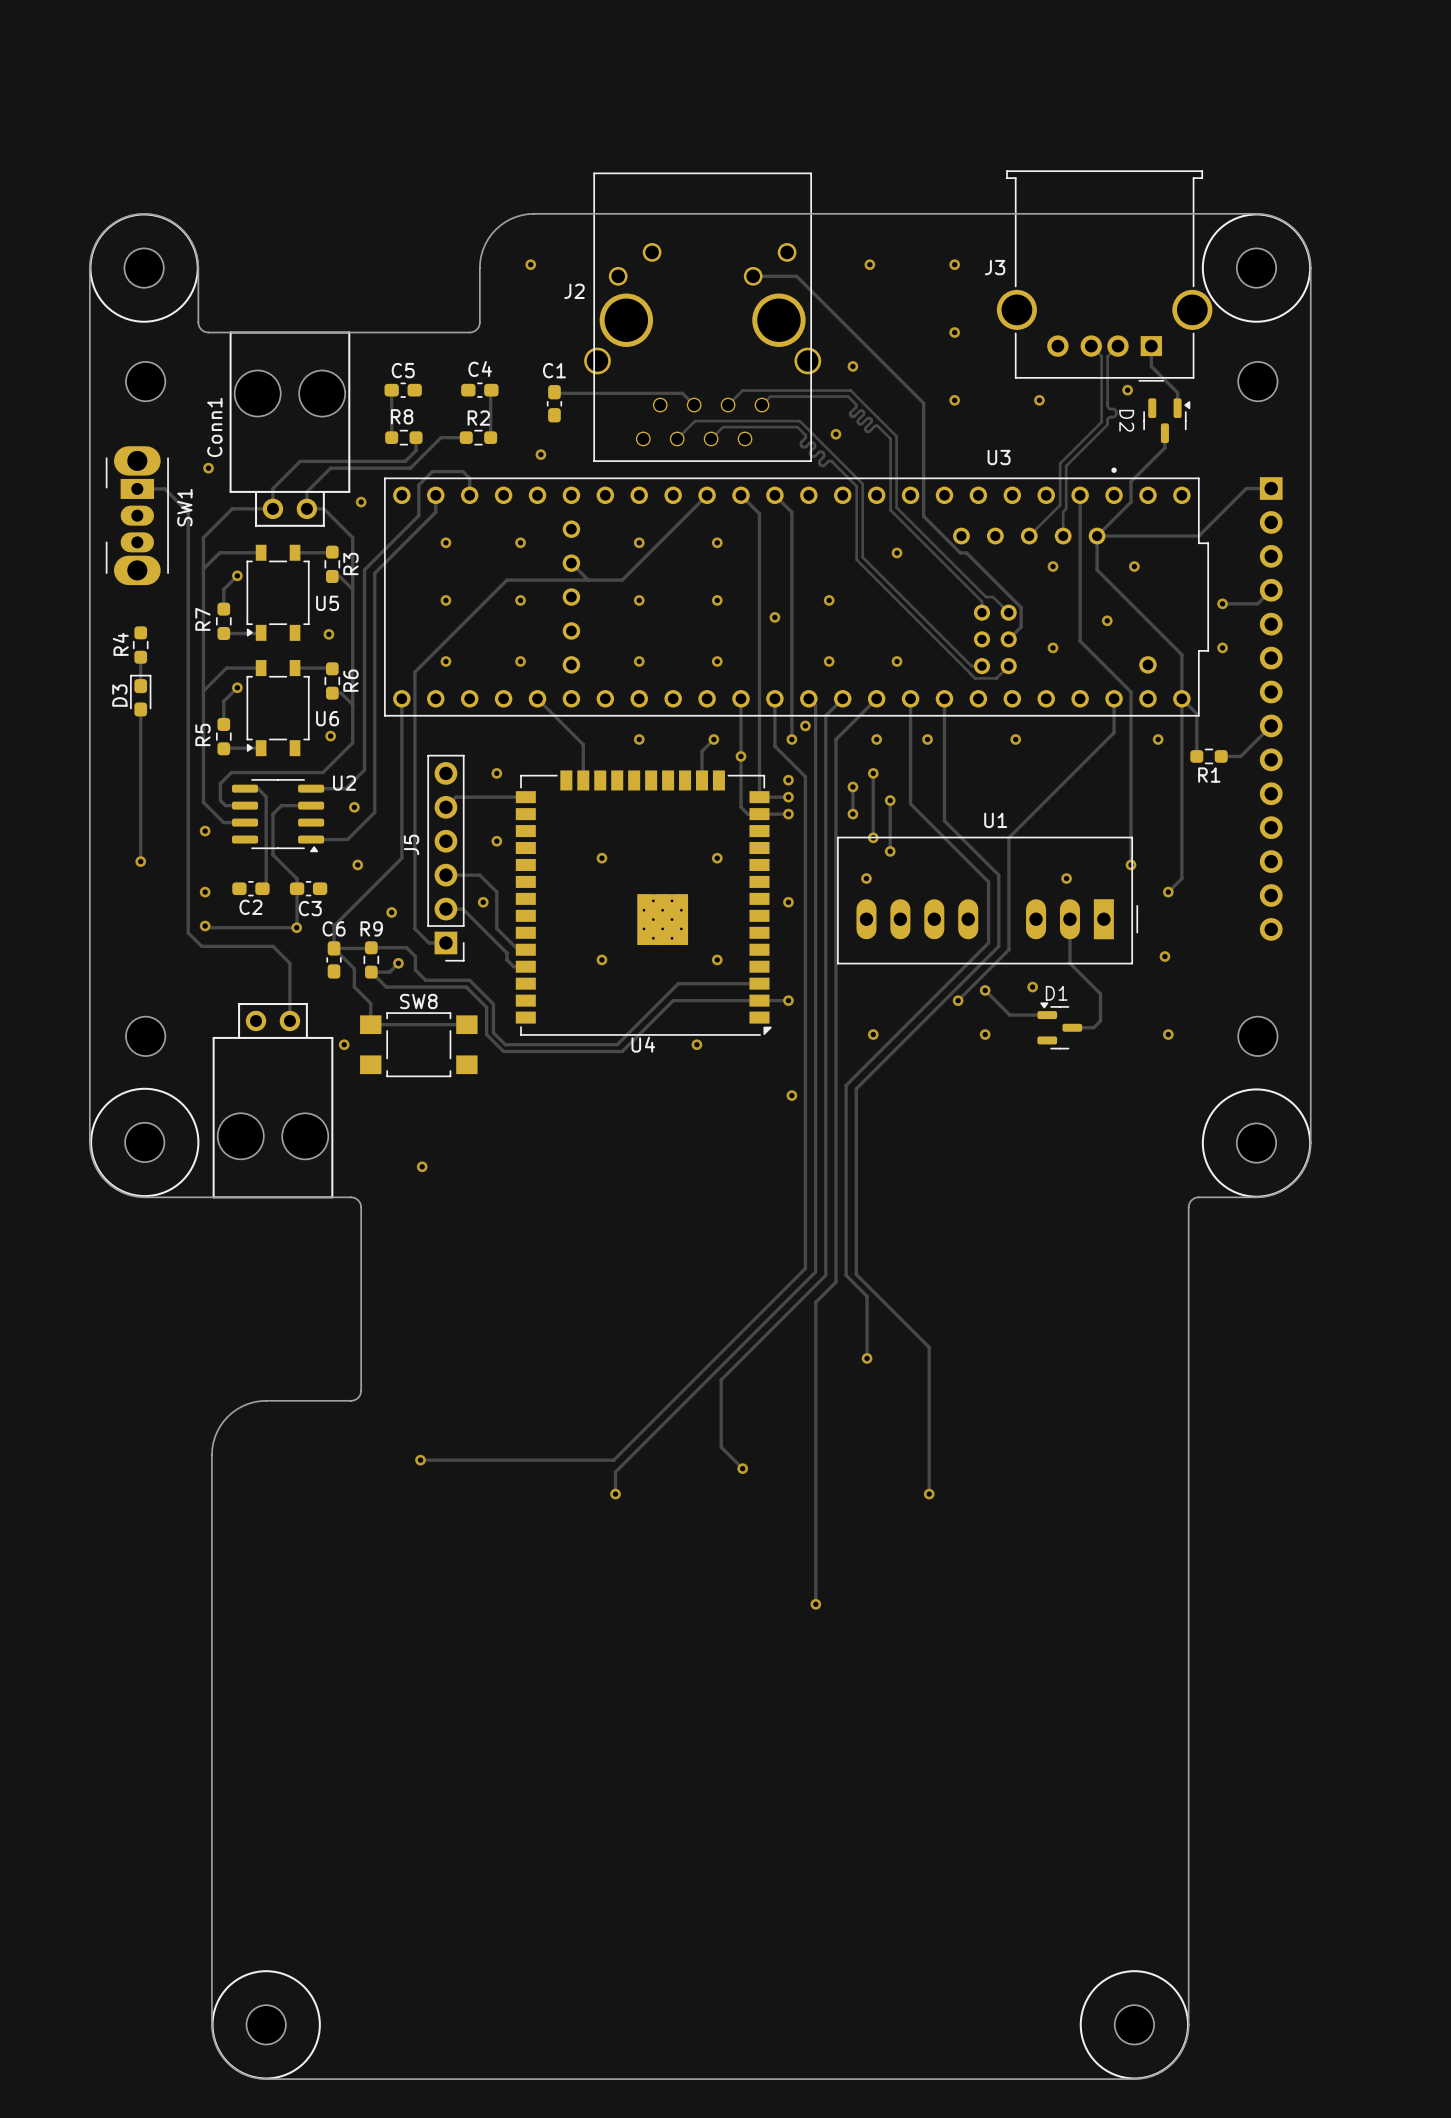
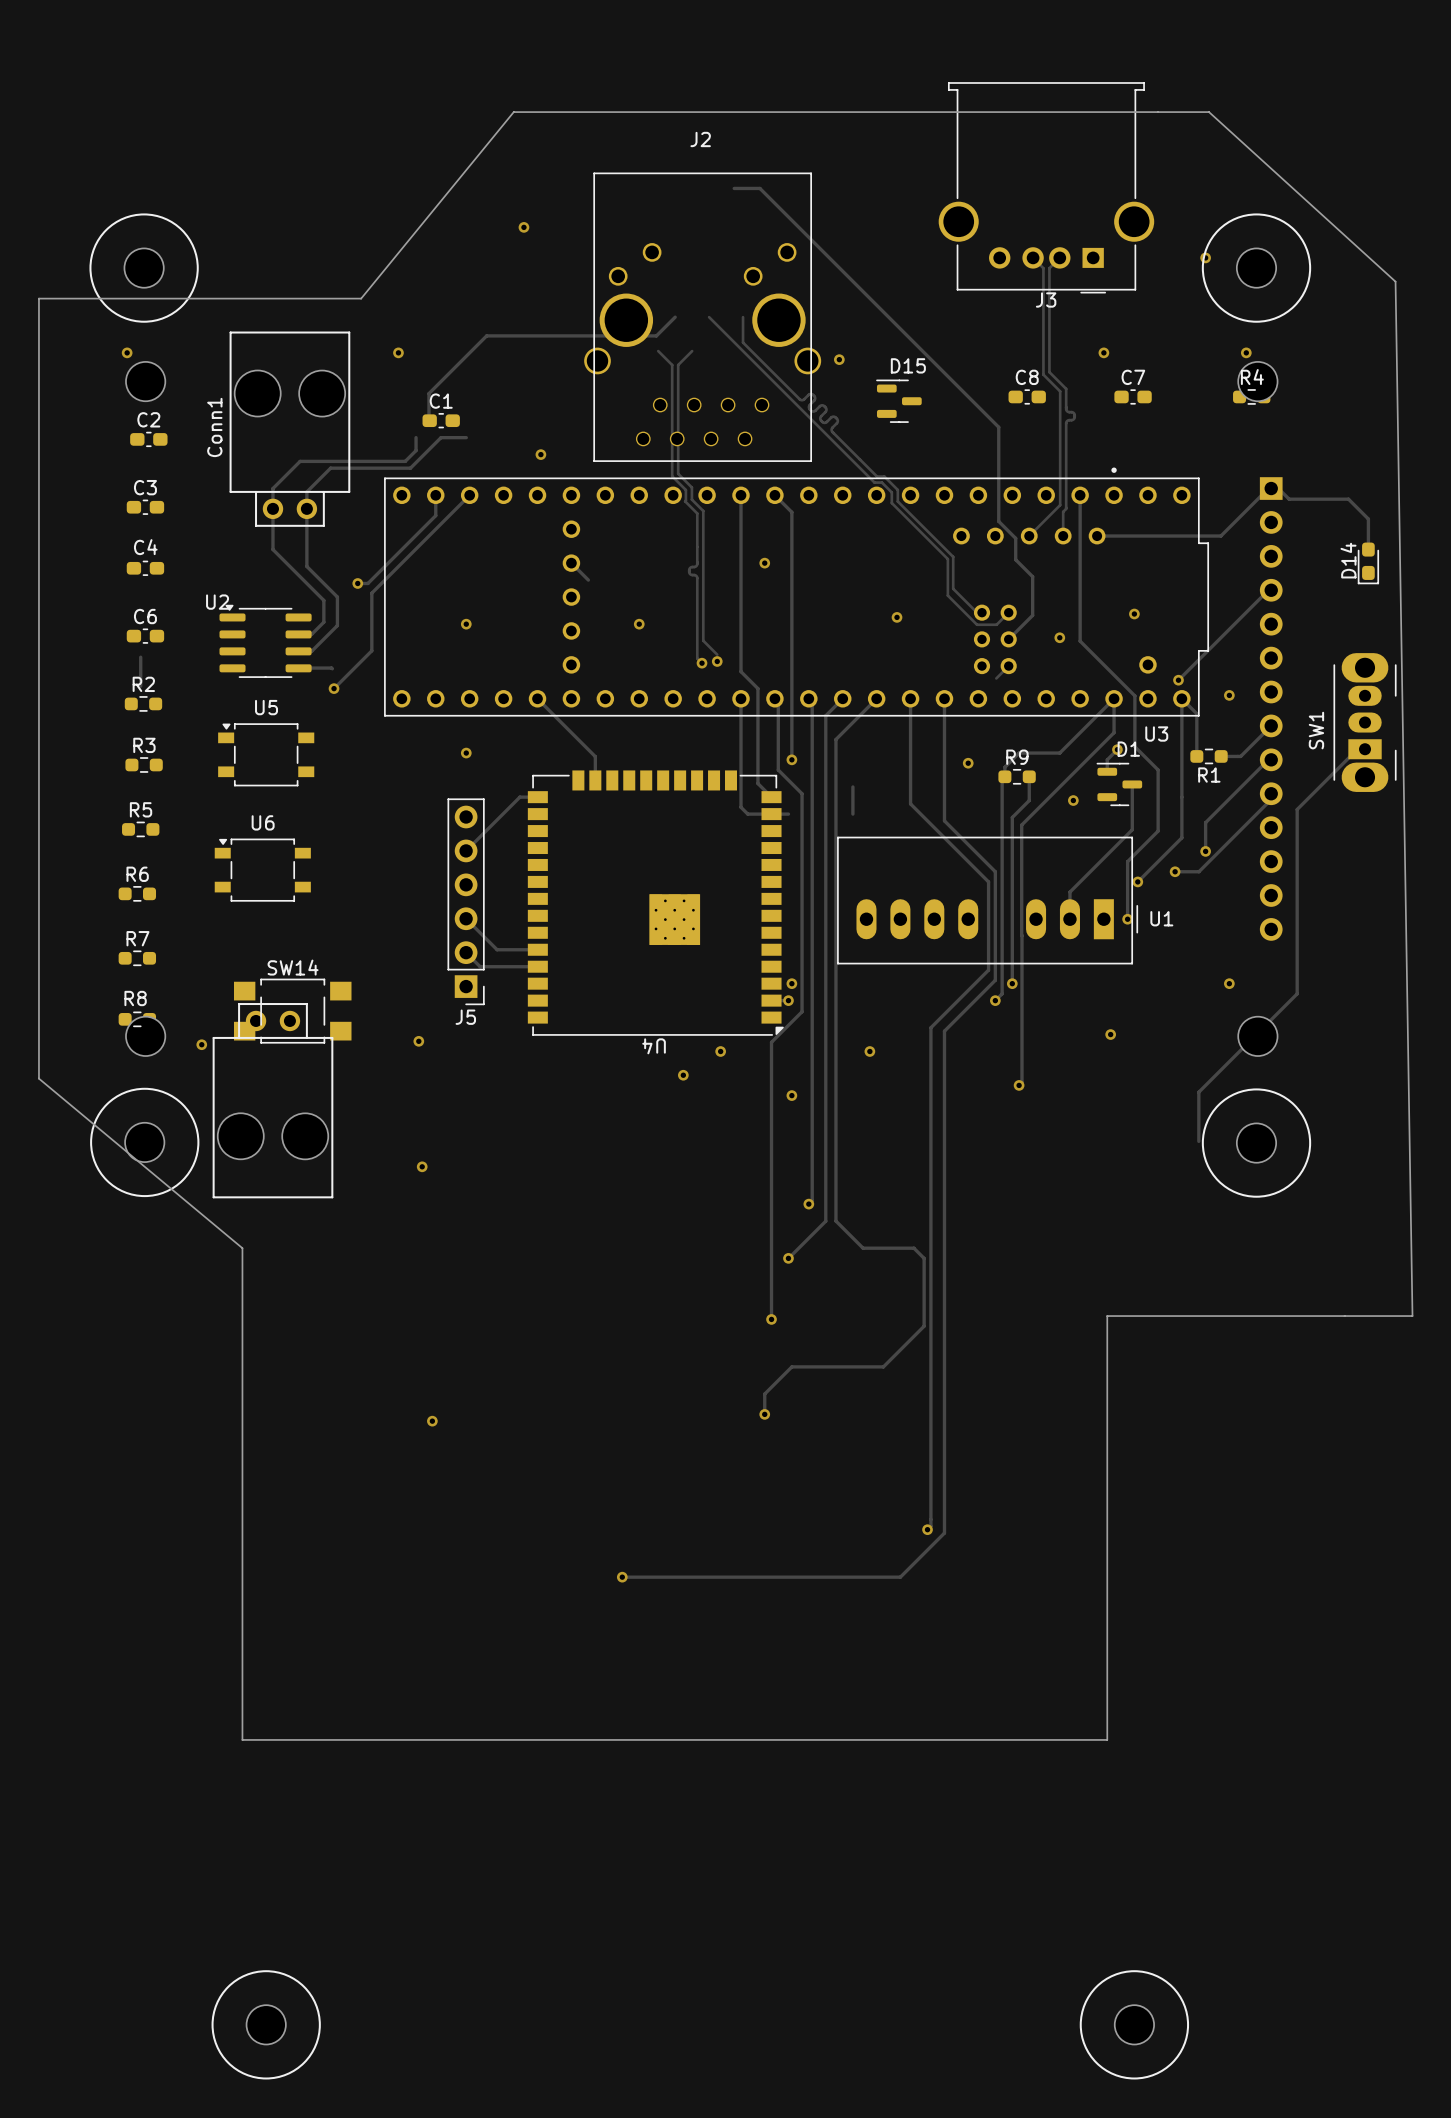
board edge: (534, 213) (1256, 213) (1274, 216) (1290, 225) (1298, 234) (1307, 250) (1310, 268) (1310, 1149) (1305, 1166) (1298, 1176) (1280, 1191) (1262, 1196) (1197, 1197) (1191, 1200) (1188, 1206) (1188, 2024) (1185, 2042) (1176, 2058) (1168, 2067) (1152, 2076) (1134, 2079) (266, 2079) (248, 2076) (232, 2067) (223, 2058) (214, 2042) (211, 2024) (213, 1443) (223, 1421) (232, 1412) (248, 1403) (266, 1400) (352, 1400) (359, 1395) (361, 1206) (357, 1199) (350, 1197) (137, 1196) (123, 1193) (111, 1185) (101, 1175) (91, 1157) (89, 1143) (90, 261) (96, 242) (103, 232) (113, 223) (124, 217) (137, 214) (157, 215) (169, 220) (180, 227) (188, 237) (194, 248) (198, 268) (198, 323) (204, 331) (471, 332) (476, 329) (479, 323) (480, 262) (485, 244) (495, 229) (505, 222) (516, 216) (534, 213) -> (513, 112) (361, 298) (38, 298) (38, 1078) (242, 1248) (242, 1739) (1107, 1739) (1107, 1316) (1412, 1316) (1395, 281) (1209, 112) (513, 112)
via: none -> (1205, 257)
via position: (530, 264) -> (523, 227)
via: (869, 264) -> none
via: (954, 264) -> none
J3 name position: J3 (995, 267) -> J3 (1046, 300)
J3 position: (1104, 275) -> (1046, 187)
track: (753, 276) (796, 276) (923, 403) (923, 516) (960, 552) (966, 552) (1021, 607) (1021, 626) -> (734, 188) (759, 188) (998, 427) (998, 521) (1015, 538) (1015, 559) (1032, 576) (1032, 615) (1021, 626)
J2 name position: J2 (574, 291) -> J2 (700, 139)
track: none -> (675, 317) (656, 335) (486, 335) (428, 393) (429, 420)
via: (954, 332) -> none
track: (1091, 346) (1101, 356) (1101, 422) (1060, 463) -> (1033, 257) (1043, 268) (1043, 374) (1060, 391) (1060, 463)
track: (1117, 346) (1107, 356) (1107, 406) (1115, 409) (1115, 415) (1108, 417) (1107, 424) (1066, 466) -> (1059, 257) (1049, 268) (1049, 372) (1066, 388) (1066, 409) (1074, 414) (1073, 419) (1066, 423) (1066, 466)
track: (1151, 346) (1151, 366) (1177, 392) (1177, 408) -> none
track: none -> (658, 351) (672, 365) (672, 476) (685, 490) (685, 501) (697, 513) (697, 564) (690, 567) (689, 571) (697, 577) (697, 658) (701, 663)
track: none -> (692, 351) (678, 365) (678, 473) (691, 487) (691, 499) (703, 511) (703, 640) (717, 654)
via: none -> (127, 352)
via: none -> (398, 352)
via: none -> (1103, 352)
via: none -> (1246, 352)
via position: (852, 366) -> (839, 359)
track: (391, 390) (391, 437) -> none
C5: (403, 390) -> none
C4 position: (479, 390) -> (145, 568)
track: (491, 390) (490, 437) -> none
via: (1127, 390) -> none
track: (554, 392) (682, 393) (694, 405) -> none
C8: none -> (1027, 396)
C7: none -> (1133, 396)
via: (954, 400) -> none
via: (1039, 400) -> none
D15: none -> (898, 401)
C1 rotation: 0° (554, 403) -> 90° clockwise (441, 420)
C1 position: (554, 403) -> (441, 420)
track: (728, 405) (742, 390) (850, 390) (896, 436) (896, 507) (986, 597) (993, 597) (1008, 612) -> (709, 317) (874, 482) (881, 482) (891, 492) (891, 503) (947, 559) (947, 595) (977, 624) (996, 624) (1008, 612)
track: (762, 405) (770, 396) (848, 396) (856, 405) (850, 412) (850, 415) (853, 416) (861, 410) (864, 413) (857, 420) (859, 423) (861, 424) (868, 418) (871, 419) (865, 428) (865, 430) (869, 431) (877, 425) (890, 438) (890, 510) (982, 601) (982, 612) -> (743, 317) (743, 342) (800, 399) (803, 399) (809, 394) (813, 394) (815, 399) (809, 408) (813, 411) (821, 405) (825, 407) (826, 410) (820, 418) (822, 422) (826, 422) (832, 416) (836, 418) (837, 422) (832, 428) (832, 431) (877, 476) (884, 476) (897, 489) (897, 501) (953, 556) (953, 588) (977, 612) (982, 612)
D2: (1166, 420) -> none
track: (1164, 433) (1164, 447) (1131, 481) (1131, 502) (1097, 536) (1097, 569) (1181, 654) (1181, 698) -> none
via: (835, 434) -> none
R8 position: (403, 437) -> (137, 1019)
R2 position: (478, 437) -> (143, 703)
track: (677, 438) (695, 421) (799, 421) (862, 483) (862, 557) (971, 666) (982, 666) -> none
track: (711, 438) (722, 427) (797, 427) (805, 435) (800, 442) (801, 445) (805, 447) (812, 442) (815, 445) (810, 452) (811, 455) (814, 456) (820, 451) (824, 453) (819, 461) (820, 464) (823, 465) (831, 461) (856, 486) (856, 559) (969, 673) -> none
U3 name position: U3 (999, 457) -> U3 (1156, 734)
via: (208, 468) -> none
track: (137, 488) (164, 488) (188, 512) (188, 932) (201, 946) (272, 946) (289, 963) (289, 1020) -> none
track: (1271, 488) (1246, 488) (1198, 536) -> (1368, 549) (1368, 519) (1348, 499) (1289, 499) (1273, 483) (1220, 536) (1198, 536)
track: (469, 495) (469, 478) (462, 471) (432, 471) (418, 485) (418, 515) (364, 569) (364, 770) (345, 788) (311, 788) -> (469, 495) (371, 593) (371, 650) (334, 688)
track: (741, 495) (759, 513) (759, 797) (788, 797) -> (741, 495) (741, 671) (757, 688) (757, 783) (771, 797)
via: (361, 502) -> none
track: (700, 502) (622, 580) (506, 580) (414, 672) (414, 928) (428, 942) (445, 942) -> none
track: (272, 508) (232, 508) (203, 537) (203, 802) (223, 822) (245, 822) -> (272, 508) (272, 549) (323, 600) (323, 622) (311, 634) (298, 634)
track: (306, 508) (323, 508) (352, 537) (352, 742) (323, 772) (231, 772) (220, 783) (220, 800) (225, 805) (245, 805) -> (306, 508) (306, 566) (337, 597) (337, 625) (311, 651) (298, 651)
track: (435, 512) (374, 573) (374, 812) (347, 839) (311, 839) -> (435, 512) (435, 515) (367, 583) (357, 583)
SW1 rotation: 0° (137, 515) -> 180° (1365, 722)
SW1 position: (137, 515) -> (1365, 722)
via: (445, 542) -> none
via: (520, 542) -> none
via: (639, 542) -> none
via: (717, 542) -> none
track: (261, 552) (219, 552) (203, 569) -> none
track: (332, 552) (295, 552) -> none
via: (897, 552) -> none
R3 name position: R3 (350, 563) -> R3 (144, 745)
via: none -> (764, 563)
D14: none -> (1368, 563)
R3 rotation: 0° (332, 564) -> 90° clockwise (144, 764)
R3 position: (332, 564) -> (144, 764)
via: (1053, 566) -> none
via: (1134, 566) -> none
track: (237, 575) (223, 589) (223, 609) -> none
via: (237, 575) -> none
track: (332, 576) (339, 576) (352, 589) -> none
via: none -> (357, 583)
track: none -> (1273, 585) (1178, 680)
track: (1271, 590) (1257, 603) (1222, 603) -> none
U5 rotation: 0° (278, 592) -> 90° clockwise (266, 754)
U5 position: (278, 592) -> (266, 754)
via: (445, 600) -> none
via: (520, 600) -> none
via: (639, 600) -> none
via: (717, 600) -> none
via: (829, 600) -> none
U5 name position: U5 (327, 603) -> U5 (266, 707)
via: (1222, 603) -> none
via: none -> (1134, 614)
via: (774, 617) -> none
via: none -> (897, 617)
via: (1107, 620) -> none
R7 rotation: 0° (223, 621) -> 90° clockwise (137, 958)
R7 position: (223, 621) -> (137, 958)
via: none -> (466, 624)
via: none -> (639, 624)
track: (261, 632) (223, 633) -> none
via: (328, 634) -> none
R4 rotation: 0° (140, 645) -> 90° clockwise (1251, 396)
R4 position: (140, 645) -> (1251, 396)
via position: (1053, 647) -> (1059, 637)
via: (1222, 647) -> none
via: (445, 661) -> none
via: (520, 661) -> none
via: (639, 661) -> none
via: (829, 661) -> none
via: (897, 661) -> none
via: none -> (701, 663)
track: (261, 668) (226, 668) (203, 691) -> none
track: (969, 673) (975, 678) (996, 678) -> none
R6 rotation: 0° (332, 680) -> 90° clockwise (137, 893)
R6 position: (332, 680) -> (137, 893)
R6 name position: R6 (350, 680) -> R6 (137, 874)
via: none -> (1178, 680)
track: (237, 687) (223, 701) (223, 724) -> none
via: (237, 687) -> none
via: none -> (334, 688)
track: (1131, 692) (1131, 864) -> (1131, 692) (1134, 695) (1134, 746) (1158, 770) (1158, 831) (1127, 861) (1127, 919)
track: (332, 693) (341, 693) (352, 704) -> none
D3: (140, 695) -> none
via: none -> (1229, 695)
track: (401, 698) (401, 858) (334, 926) (334, 948) -> none
track: (774, 698) (774, 746) (805, 776) (805, 1268) (613, 1460) (420, 1460) -> (774, 698) (778, 702) (778, 770) (802, 793) (802, 1011) (771, 1042) (771, 1319)
track: none -> (1114, 698) (1059, 753) (1019, 753) (1004, 767) (1004, 776) (1002, 779) (1002, 993) (995, 1000)
track: (812, 702) (815, 705) (815, 1271) (615, 1472) (615, 1494) -> (812, 702) (812, 1200) (808, 1204)
U6 rotation: 0° (278, 708) -> 90° clockwise (262, 870)
U6 position: (278, 708) -> (262, 870)
track: (140, 709) (140, 861) -> none
U6 name position: U6 (327, 718) -> U6 (263, 822)
via: (805, 725) -> none
R5 rotation: 0° (223, 736) -> 90° clockwise (140, 829)
R5 position: (223, 736) -> (140, 829)
via: (330, 736) -> none
via: (639, 739) -> none
track: (713, 739) (701, 751) (701, 780) -> none
via: (713, 739) -> none
track: none -> (791, 739) (791, 759)
via: (791, 739) -> none
via: (876, 739) -> none
via: (927, 739) -> none
via: (1015, 739) -> none
via: (1158, 739) -> none
track: (583, 744) (583, 780) -> (583, 744) (595, 756) (595, 780)
track: (261, 748) (223, 748) -> none
track: none -> (1117, 749) (1107, 759) (1107, 771)
via: none -> (1117, 749)
track: none -> (1365, 749) (1357, 749) (1297, 809) (1297, 993) (1198, 1092) (1198, 1141)
track: none -> (1273, 754) (1205, 822) (1205, 851)
via: (741, 756) -> none
via: none -> (791, 759)
via: none -> (968, 763)
via position: (496, 773) -> (466, 753)
track: (873, 773) (873, 837) -> none
via: (873, 773) -> none
track: none -> (1029, 776) (1029, 800) (1012, 817) (1012, 983)
via: (788, 780) -> none
U2 name position: U2 (344, 783) -> U2 (217, 602)
via: (852, 786) -> none
track: (245, 788) (258, 788) (266, 796) (266, 884) (262, 888) -> none
track: none -> (1273, 788) (1273, 797) (1198, 871) (1175, 871)
track: (519, 797) (456, 797) (445, 807) -> (519, 797) (466, 850)
via: (788, 797) -> none
track: (890, 800) (890, 851) -> none
via: (890, 800) -> none
via: none -> (1073, 800)
track: (311, 805) (281, 805) (272, 814) (272, 854) (297, 878) (297, 927) (206, 927) (205, 926) -> none
via: (354, 807) -> none
via: (788, 814) -> none
via: (852, 814) -> none
U2 rotation: 0° (278, 815) -> 180° (265, 641)
U2 position: (278, 815) -> (265, 641)
U1 name position: U1 (995, 820) -> U1 (1161, 918)
track: (1021, 825) (1008, 837) (1008, 949) (988, 970) -> (1021, 825) (1021, 1082) (1019, 1085)
via: (205, 831) -> none
via: (873, 837) -> none
track: (1181, 837) (1181, 878) (1168, 892) -> (1181, 837) (1137, 881)
via: (496, 841) -> none
J5 name rotation: 0° (411, 844) -> 90° clockwise (465, 1017)
J5 name position: J5 (411, 844) -> J5 (465, 1017)
via: (890, 851) -> none
via: none -> (1205, 851)
J5 position: (445, 858) -> (466, 901)
via: (601, 858) -> none
via: (717, 858) -> none
via: (140, 861) -> none
via: (357, 864) -> none
via: (1131, 864) -> none
track: (995, 871) (998, 875) (998, 946) (856, 1088) (856, 1274) (929, 1347) (929, 1494) -> (995, 871) (995, 980) (944, 1031) (944, 1533) (900, 1577) (622, 1577)
via: none -> (1175, 871)
track: (445, 875) (479, 875) (496, 892) (496, 928) (518, 949) -> (466, 918) (497, 949) (518, 949)
via: (866, 878) -> none
via: (1066, 878) -> none
via: none -> (1137, 881)
C2 position: (250, 888) -> (148, 439)
C3 position: (308, 888) -> (145, 507)
via: (205, 892) -> none
via: (1168, 892) -> none
via: (483, 902) -> none
via: (788, 902) -> none
U4 position: (643, 903) -> (655, 903)
C2 name position: C2 (250, 907) -> C2 (148, 419)
C3 name position: C3 (310, 908) -> C3 (145, 487)
track: (445, 909) (462, 909) (506, 953) (506, 959) (513, 966) -> (466, 952) (480, 966) (513, 966)
via: (391, 912) -> none
track: (1069, 919) (1069, 963) (1100, 993) (1100, 1020) (1093, 1027) (1072, 1027) -> (1069, 919) (1069, 892) (1132, 829) (1132, 784)
via: none -> (1127, 919)
via: (205, 926) -> none
via: (296, 927) -> none
track: (988, 942) (846, 1085) (846, 1275) (867, 1296) (867, 1358) -> (988, 942) (988, 970)
track: (334, 948) (354, 968) (354, 987) (370, 1003) (370, 1024) (466, 1024) -> none
track: (334, 948) (406, 947) (415, 956) (415, 970) (425, 980) (469, 980) (493, 1004) (493, 1032) (505, 1044) (617, 1044) (678, 983) (759, 983) -> none
via: (1164, 956) -> none
C6 rotation: 0° (334, 959) -> 90° clockwise (145, 636)
C6 position: (334, 959) -> (145, 636)
R9 rotation: 0° (371, 959) -> 90° clockwise (1017, 776)
R9 position: (371, 959) -> (1017, 776)
via: (601, 959) -> none
via: (717, 959) -> none
track: (398, 963) (389, 972) (371, 972) (386, 987) (466, 987) (486, 1007) (486, 1034) (503, 1051) (622, 1051) (673, 1000) (771, 1000) -> none
via: (398, 963) -> none
via: none -> (791, 983)
via: none -> (1012, 983)
via: none -> (1229, 983)
via: (1032, 987) -> none
track: (985, 990) (1009, 1015) (1047, 1015) -> none
via: (985, 990) -> none
track: none -> (958, 1000) (930, 1027) (930, 1526) (927, 1529)
via: (958, 1000) -> none
via: none -> (995, 1000)
D1 footprint: [1037, 1002, 1083, 1050] -> [1096, 762, 1143, 807]
SW14: none -> (292, 1011)
via position: (873, 1034) -> (869, 1051)
via: (985, 1034) -> none
via: none -> (1110, 1034)
via: (1168, 1034) -> none
via: none -> (418, 1041)
via: none -> (201, 1044)
via: (344, 1044) -> none
SW8: (418, 1044) -> none
U4 name rotation: 0° (643, 1044) -> 180° (654, 1046)
via: (696, 1044) -> none
via: none -> (720, 1051)
via: none -> (683, 1075)
via: none -> (1019, 1085)
via: none -> (808, 1204)
track: (825, 1221) (825, 1275) (721, 1379) (721, 1447) (742, 1468) -> (825, 1221) (788, 1258)
track: (835, 1221) (835, 1282) (815, 1302) (815, 1604) -> (835, 1221) (863, 1248) (913, 1248) (924, 1258) (924, 1326) (883, 1366) (791, 1366) (764, 1394) (764, 1414)
via: none -> (788, 1258)
via: none -> (771, 1319)
via: (867, 1358) -> none
via: none -> (764, 1414)
via position: (420, 1460) -> (432, 1421)
via: (742, 1468) -> none
via: (615, 1494) -> none
via position: (929, 1494) -> (927, 1529)
via: none -> (622, 1577)
via: (815, 1604) -> none

